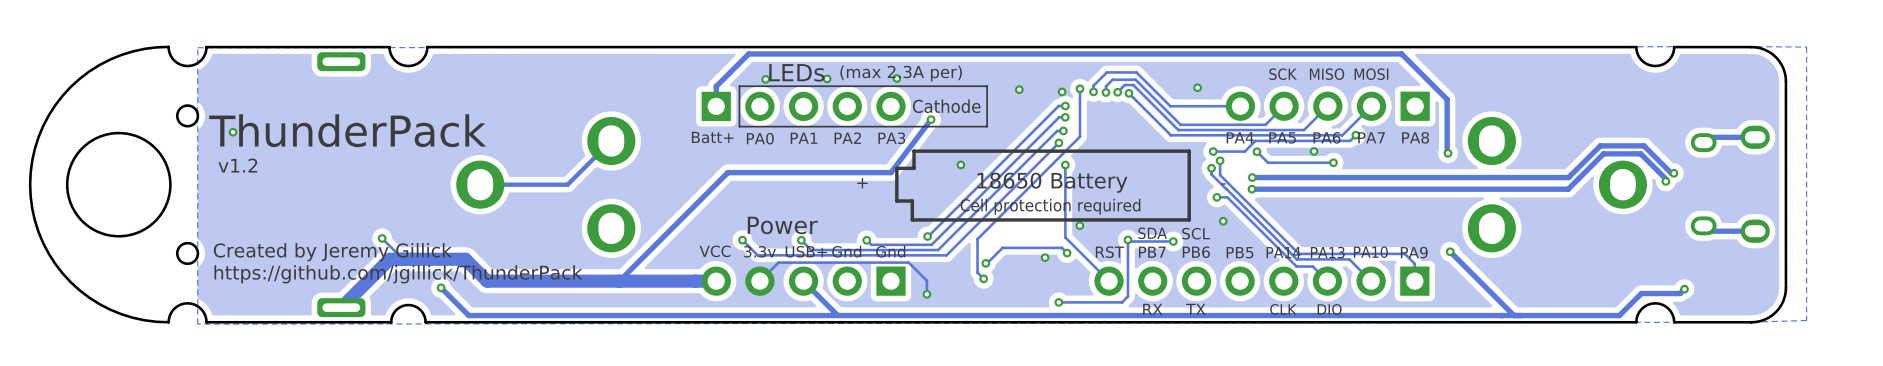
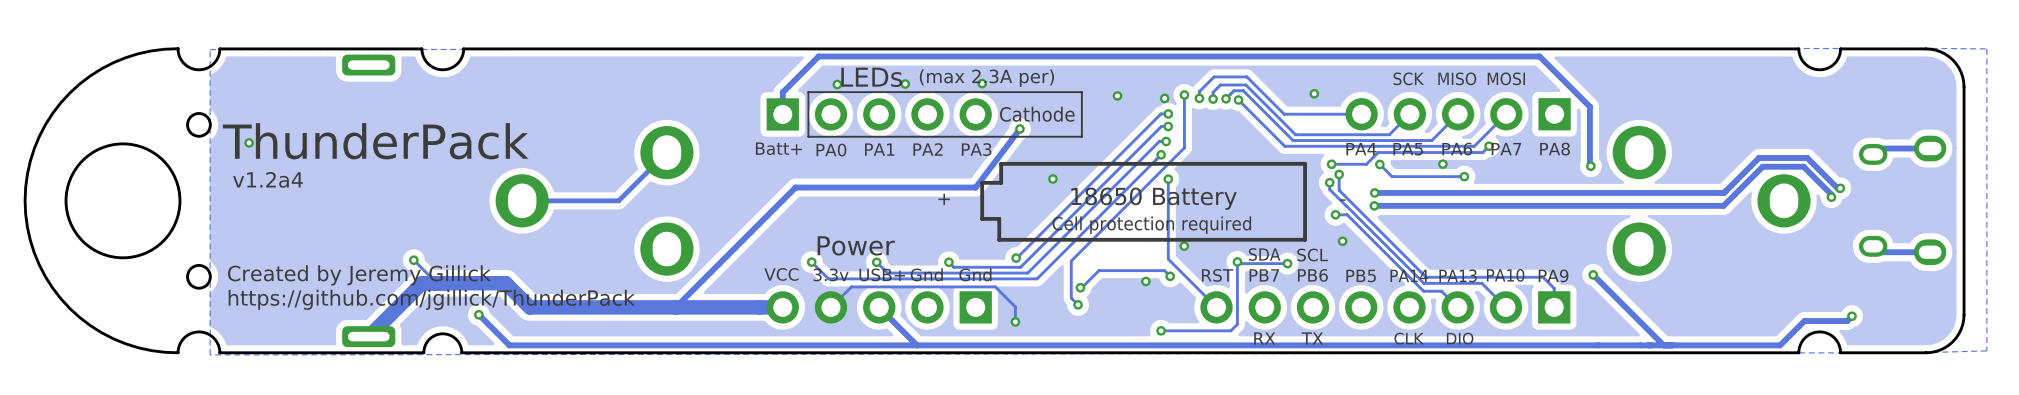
text: v1.2 (237, 165) -> v1.2a4 (267, 179)

